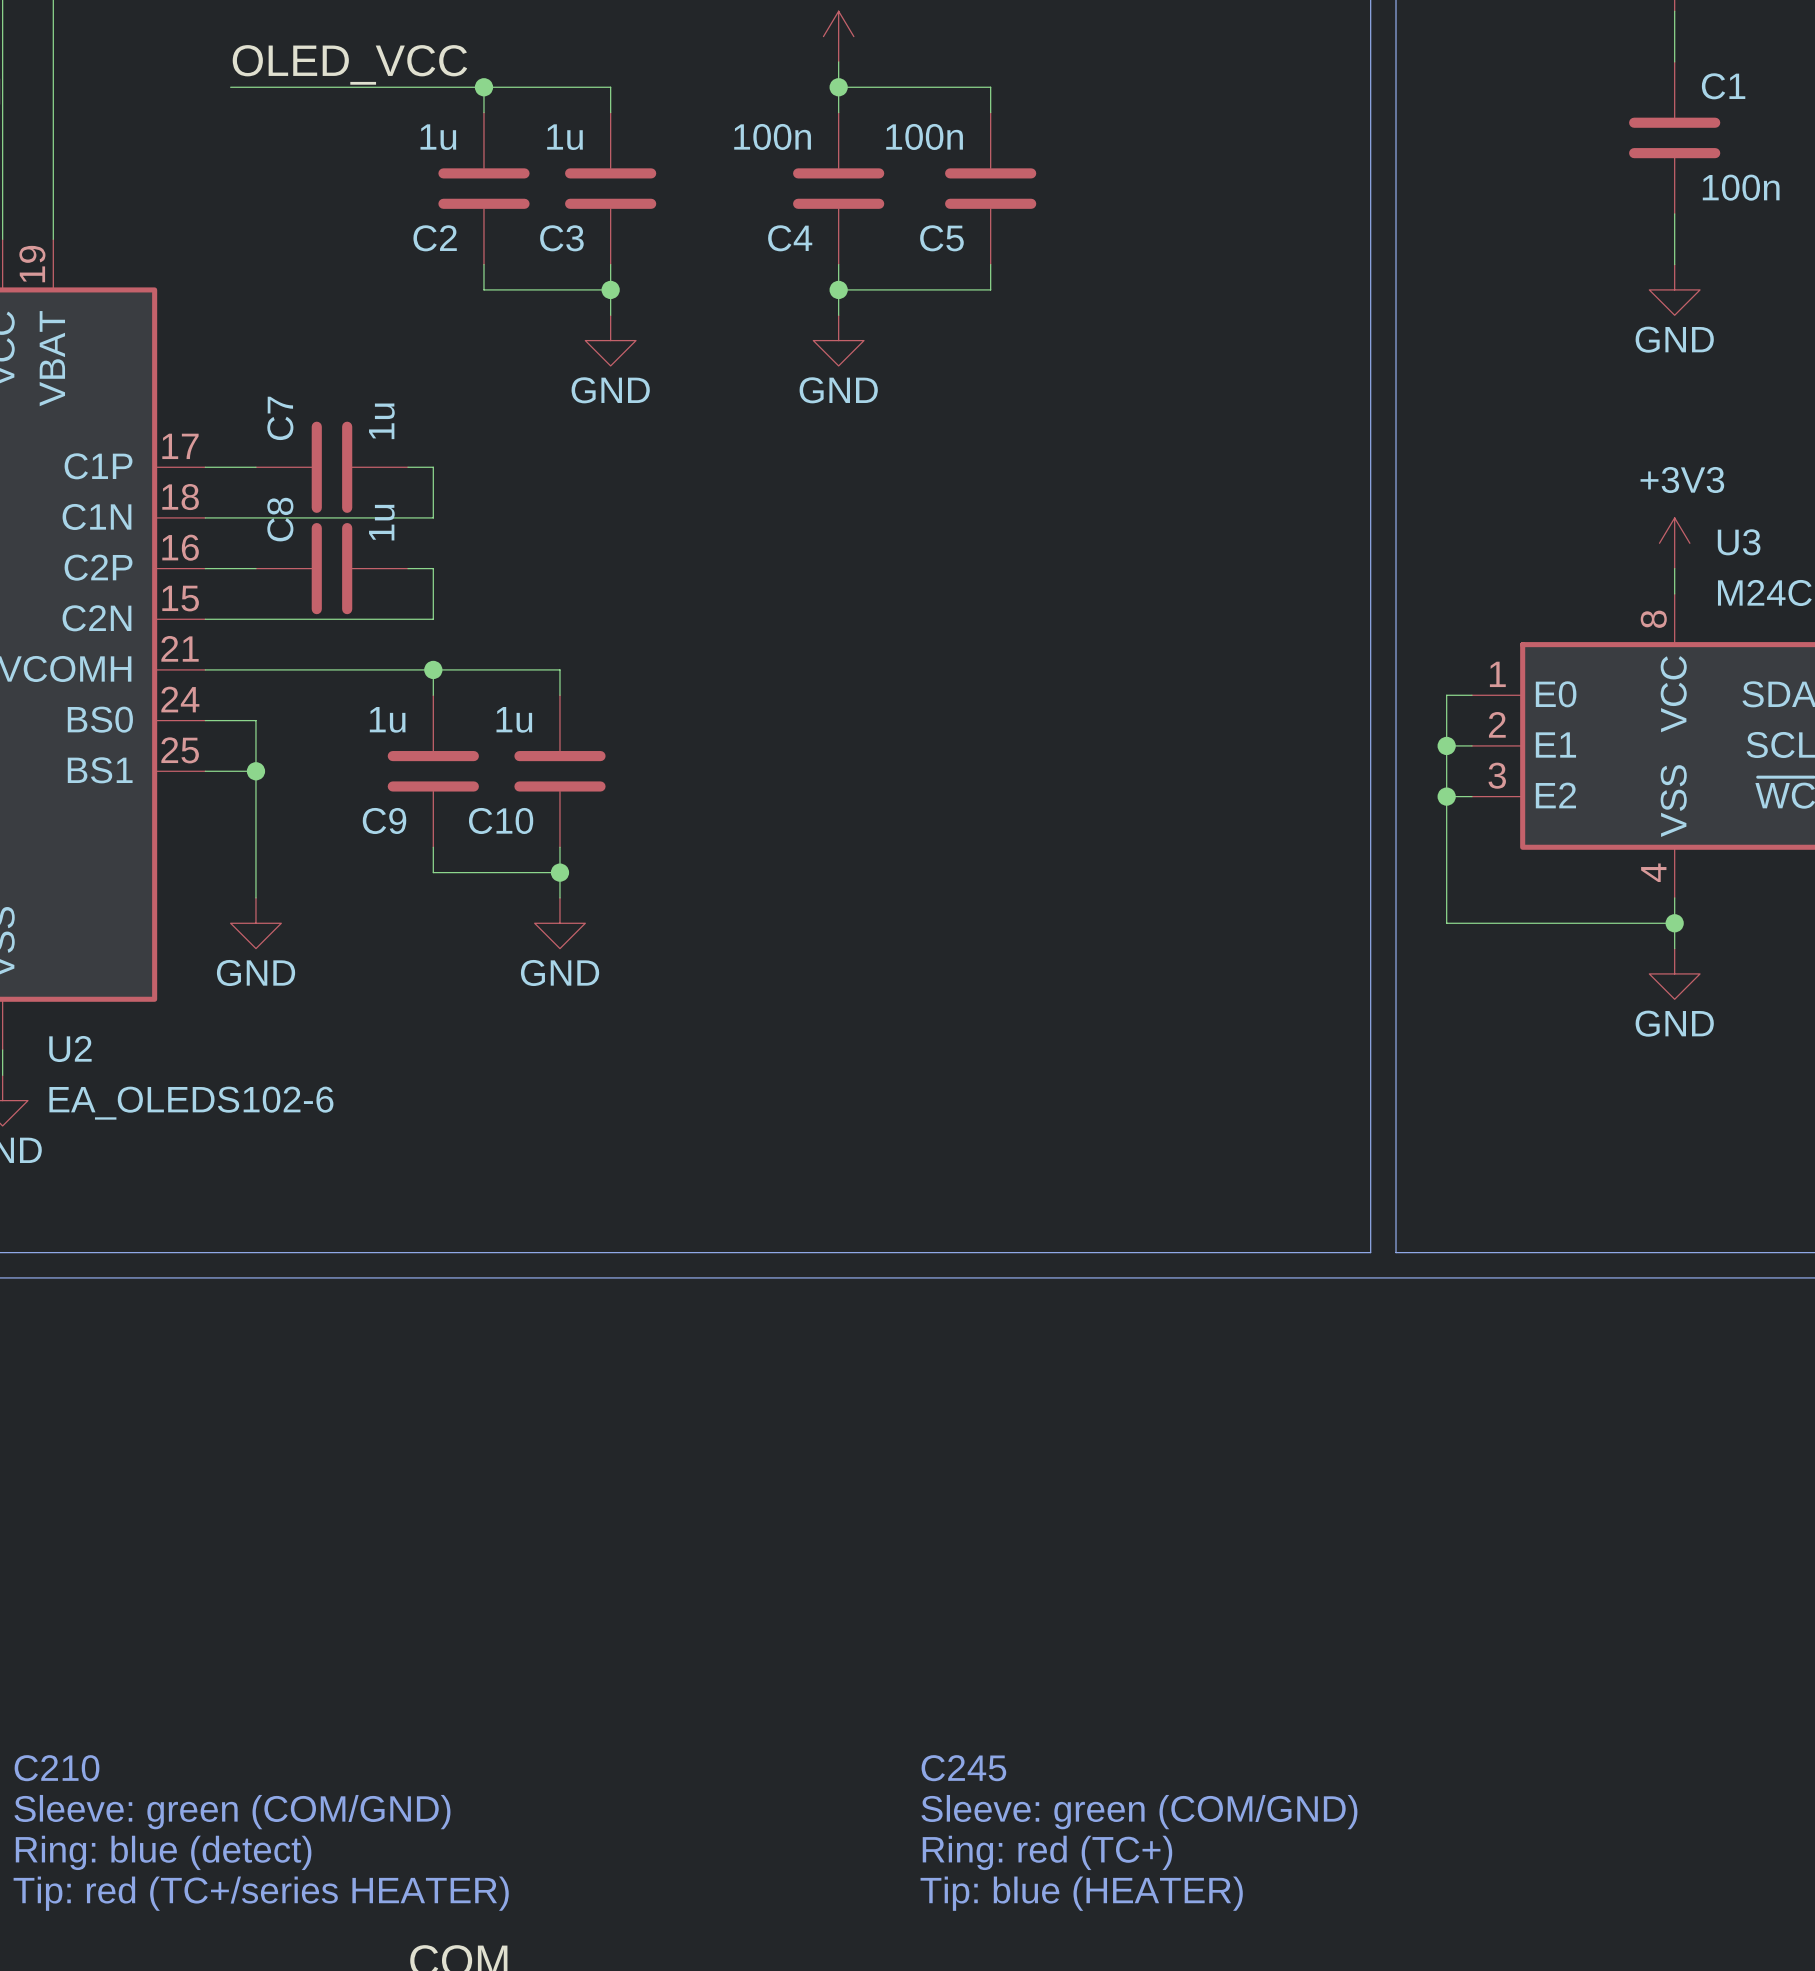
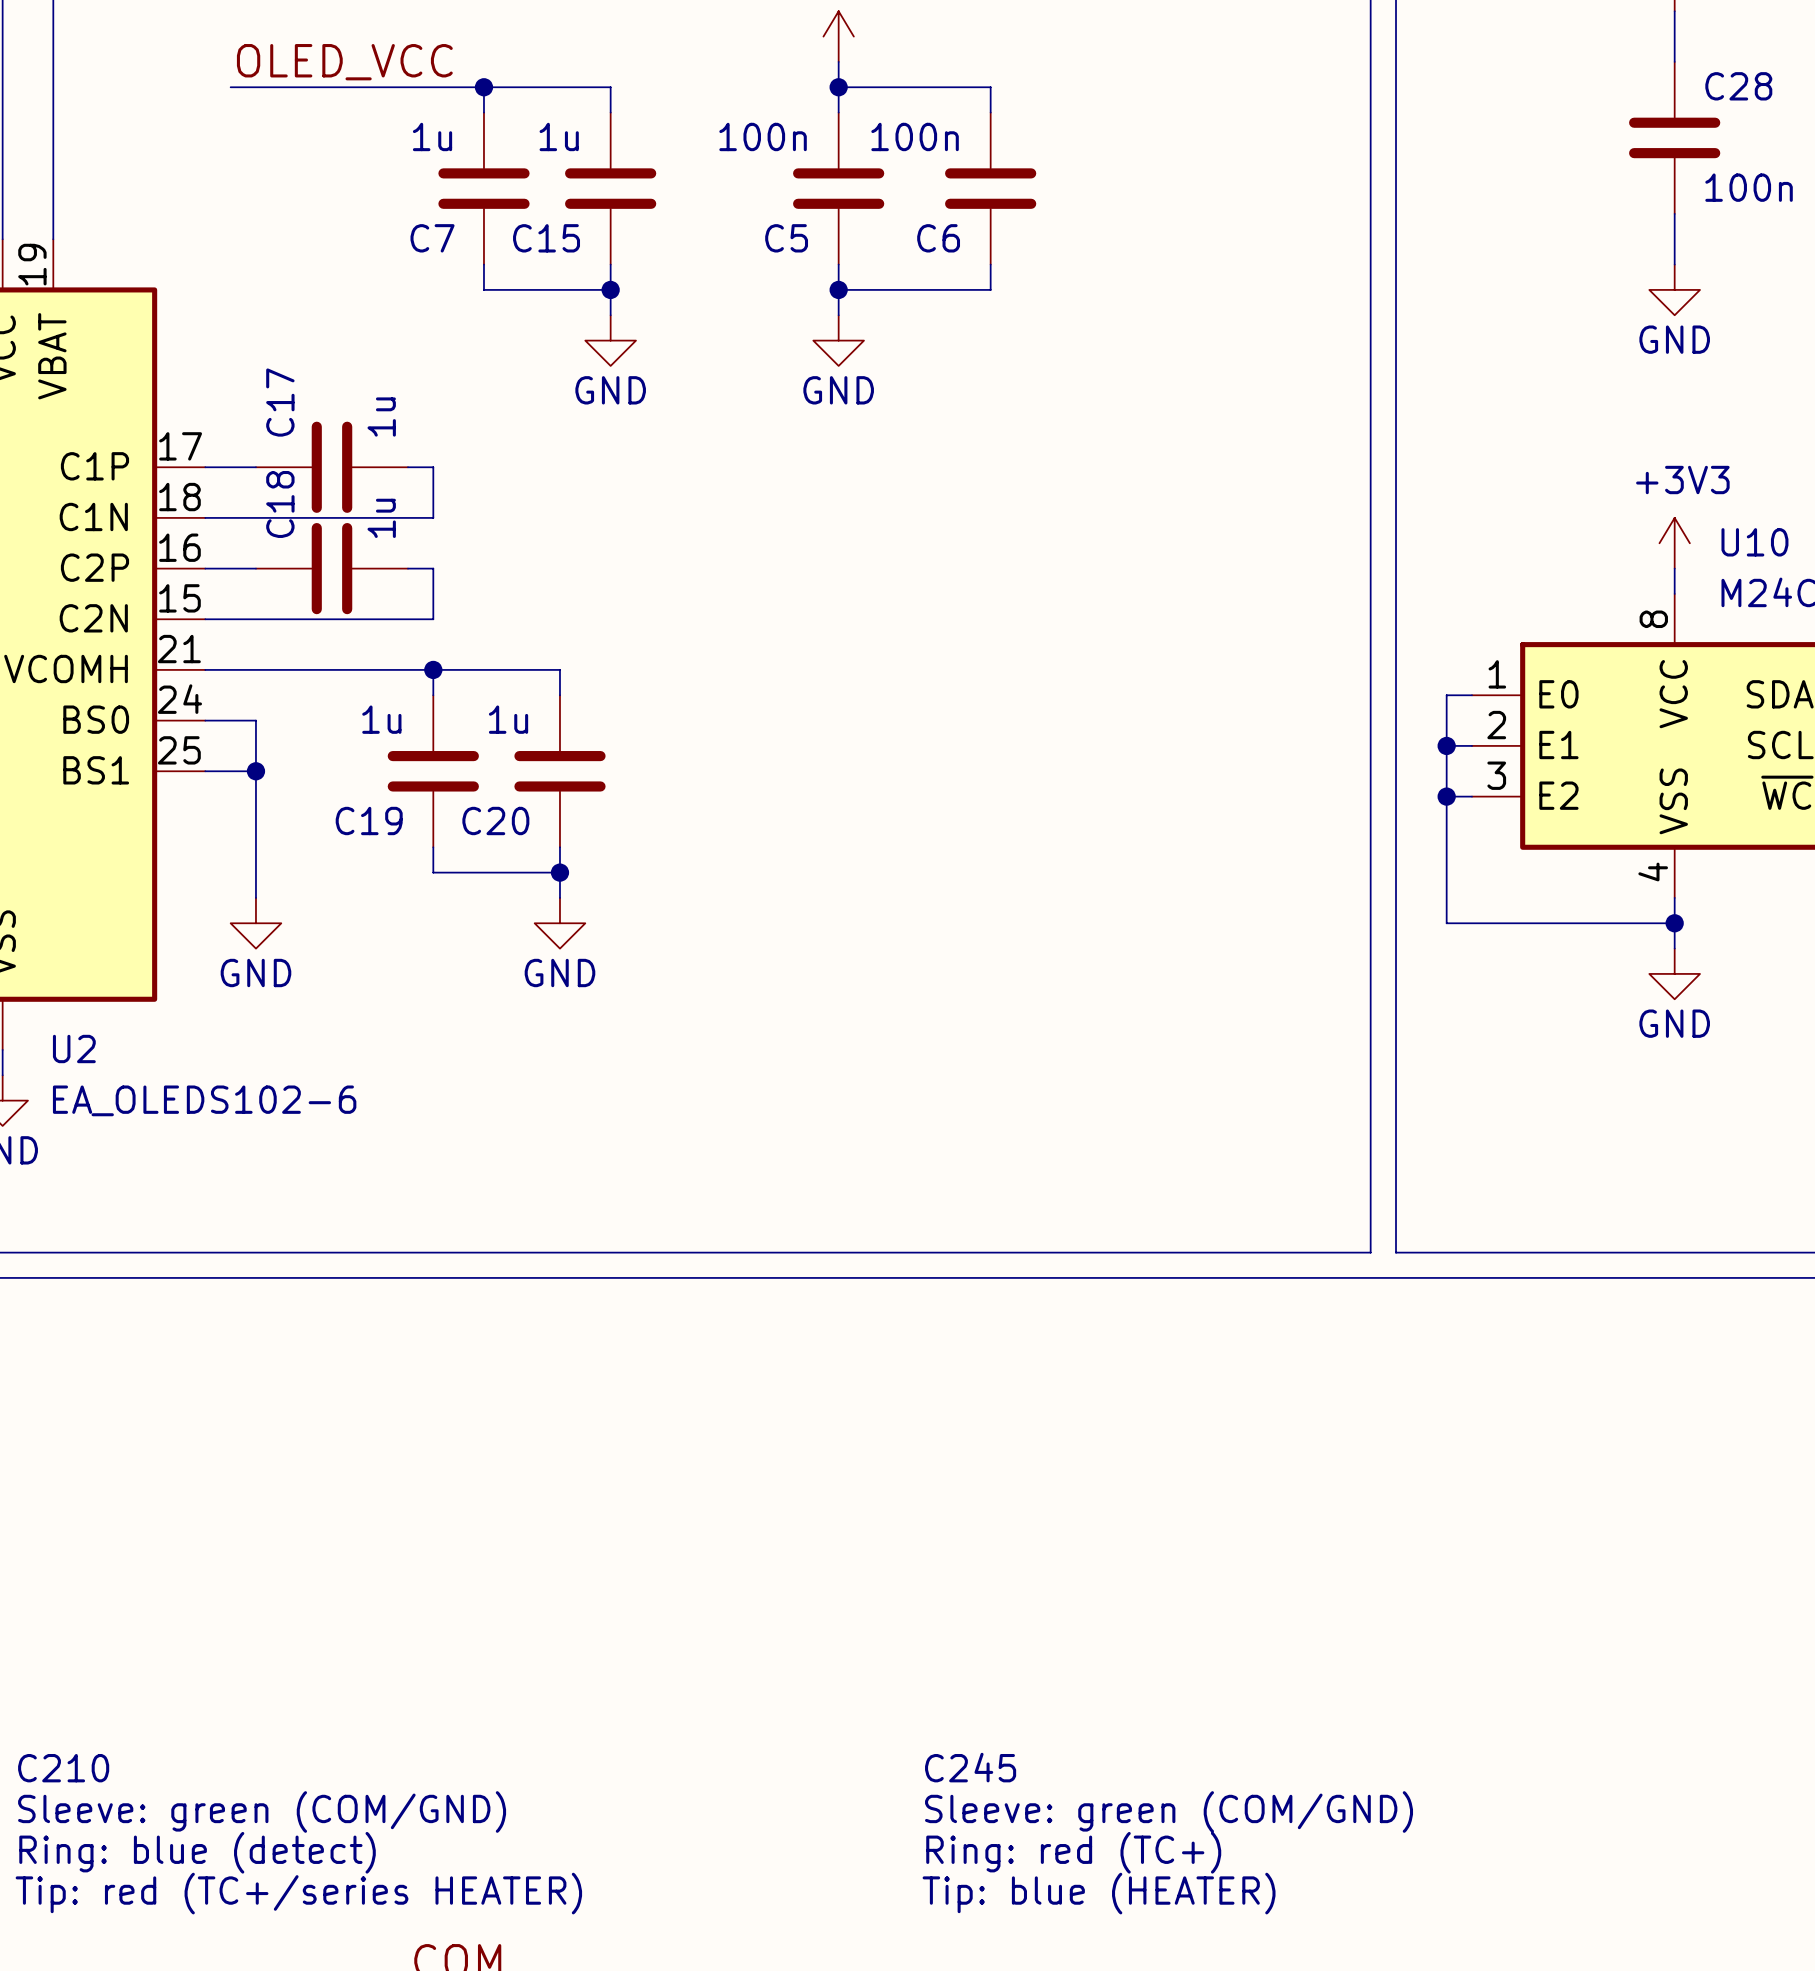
C1 name: C1 (1723, 86) -> C28 (1738, 86)
C2 name: C2 (435, 238) -> C7 (432, 238)
C3 name: C3 (561, 238) -> C15 (546, 238)
C4 name: C4 (790, 238) -> C5 (786, 238)
C5 name: C5 (941, 238) -> C6 (938, 238)
C7 name: C7 (280, 418) -> C17 (280, 402)
C8 name: C8 (280, 519) -> C18 (280, 504)
U3 name: U3 (1739, 542) -> U10 (1754, 542)
C9 name: C9 (384, 820) -> C19 (369, 820)
C10 name: C10 (501, 820) -> C20 (495, 820)

